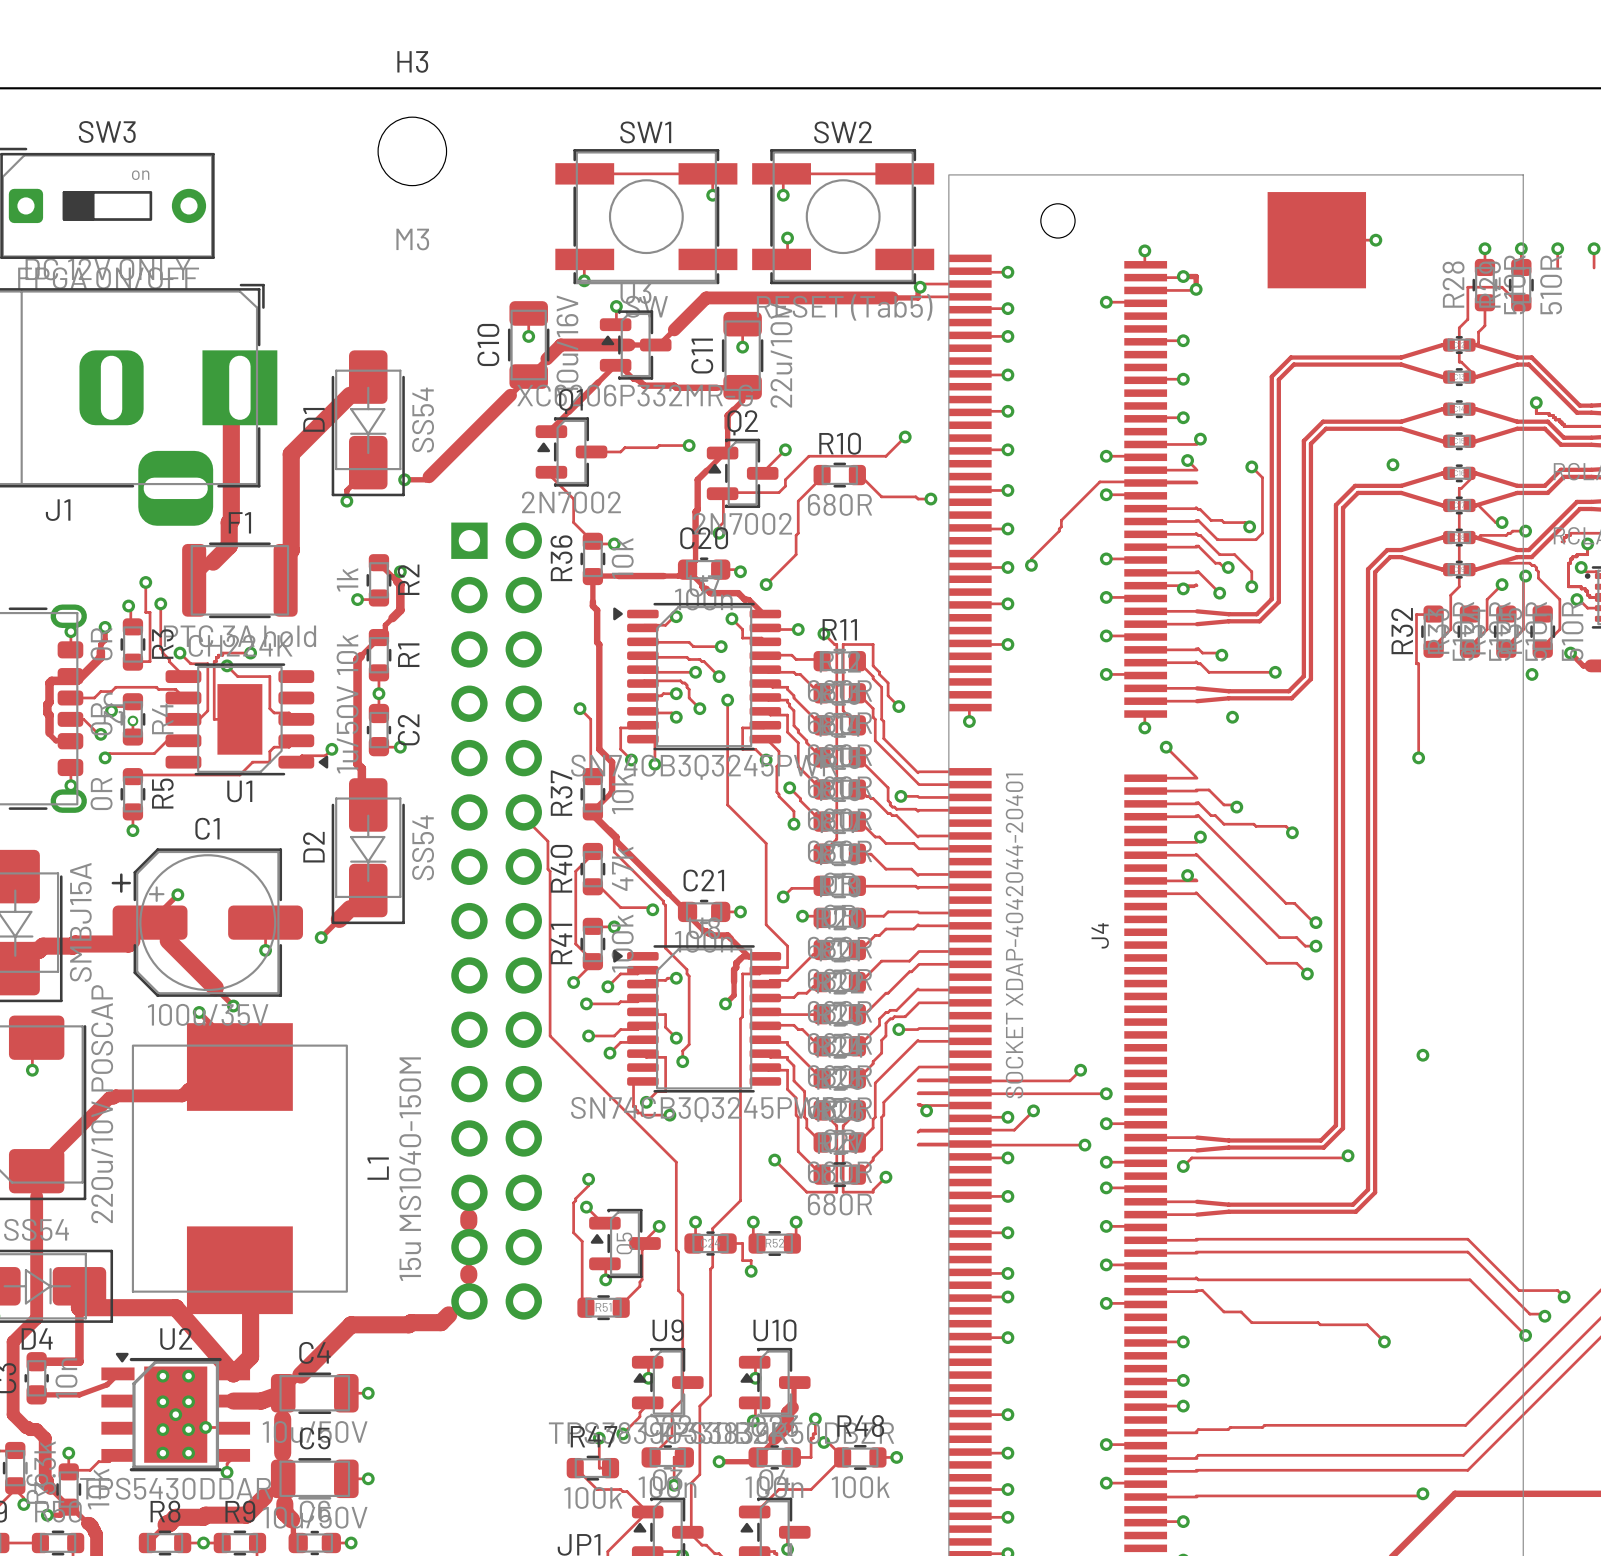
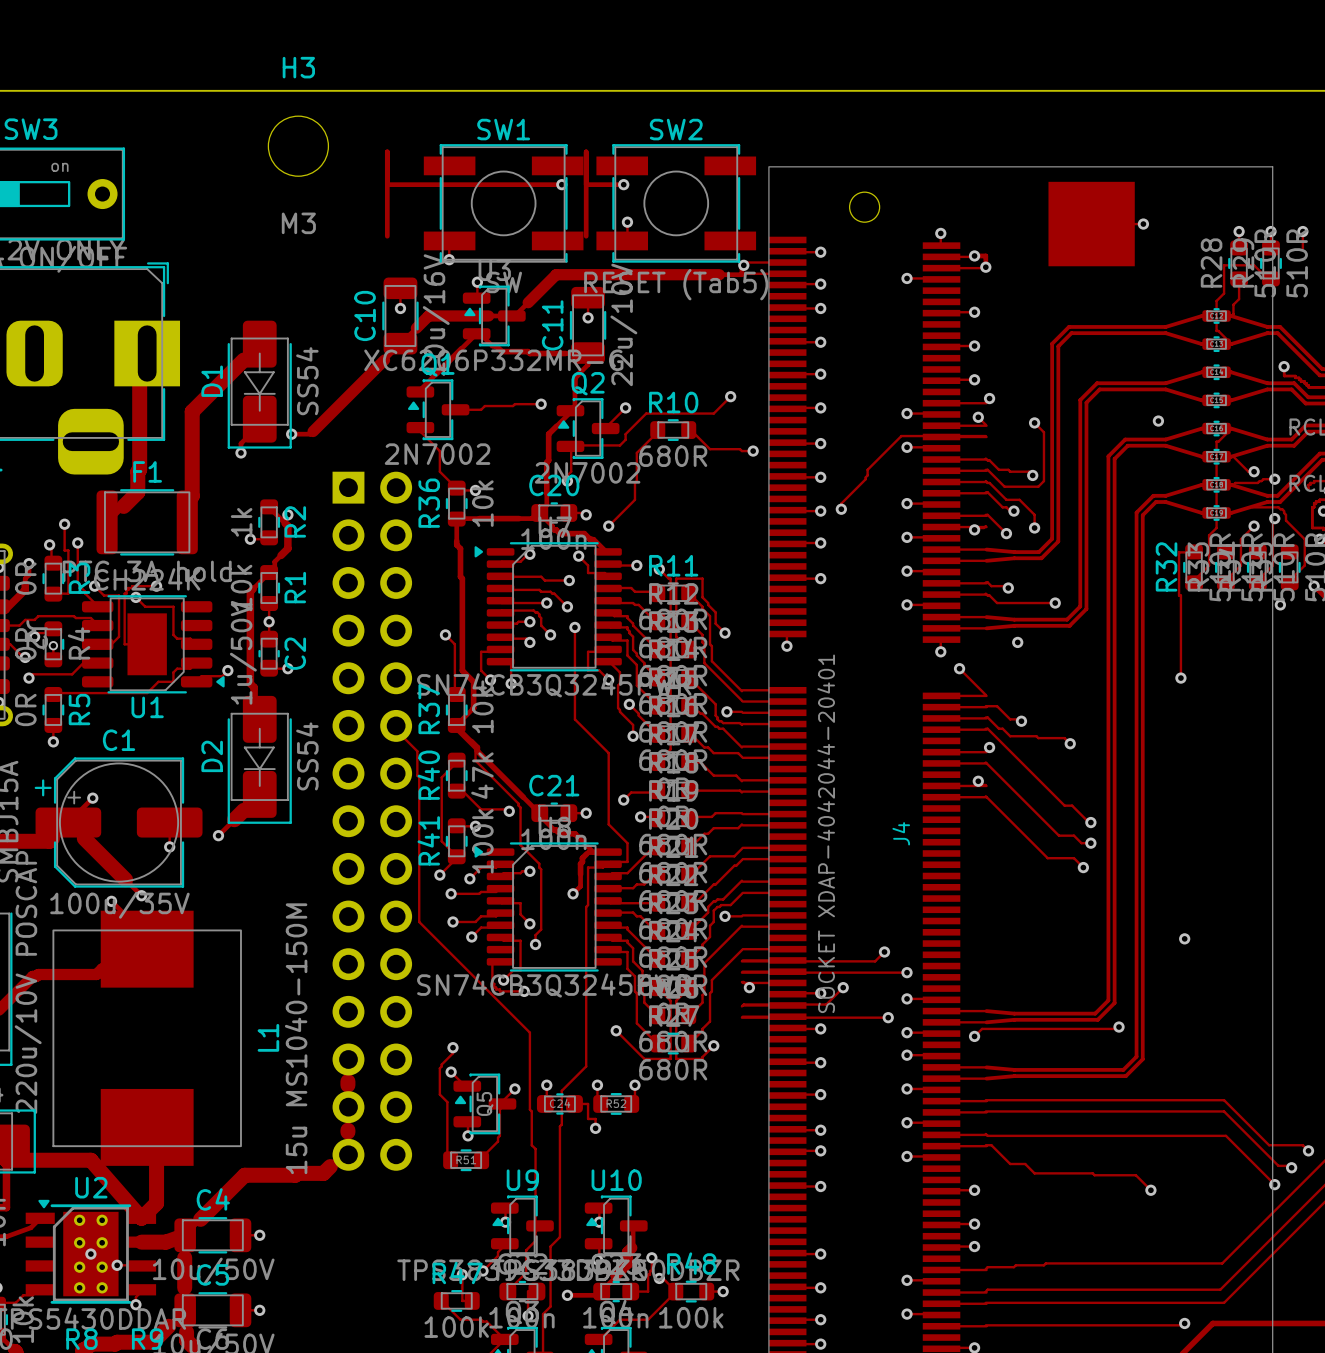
track: none -> (387, 151) (387, 236)
track: none -> (586, 151) (586, 236)
track: (584, 173) (708, 173) (712, 178) (712, 195) -> (387, 184) (561, 184)
track: (911, 173) (787, 173) (783, 178) (783, 195) -> (586, 184) (623, 184)

